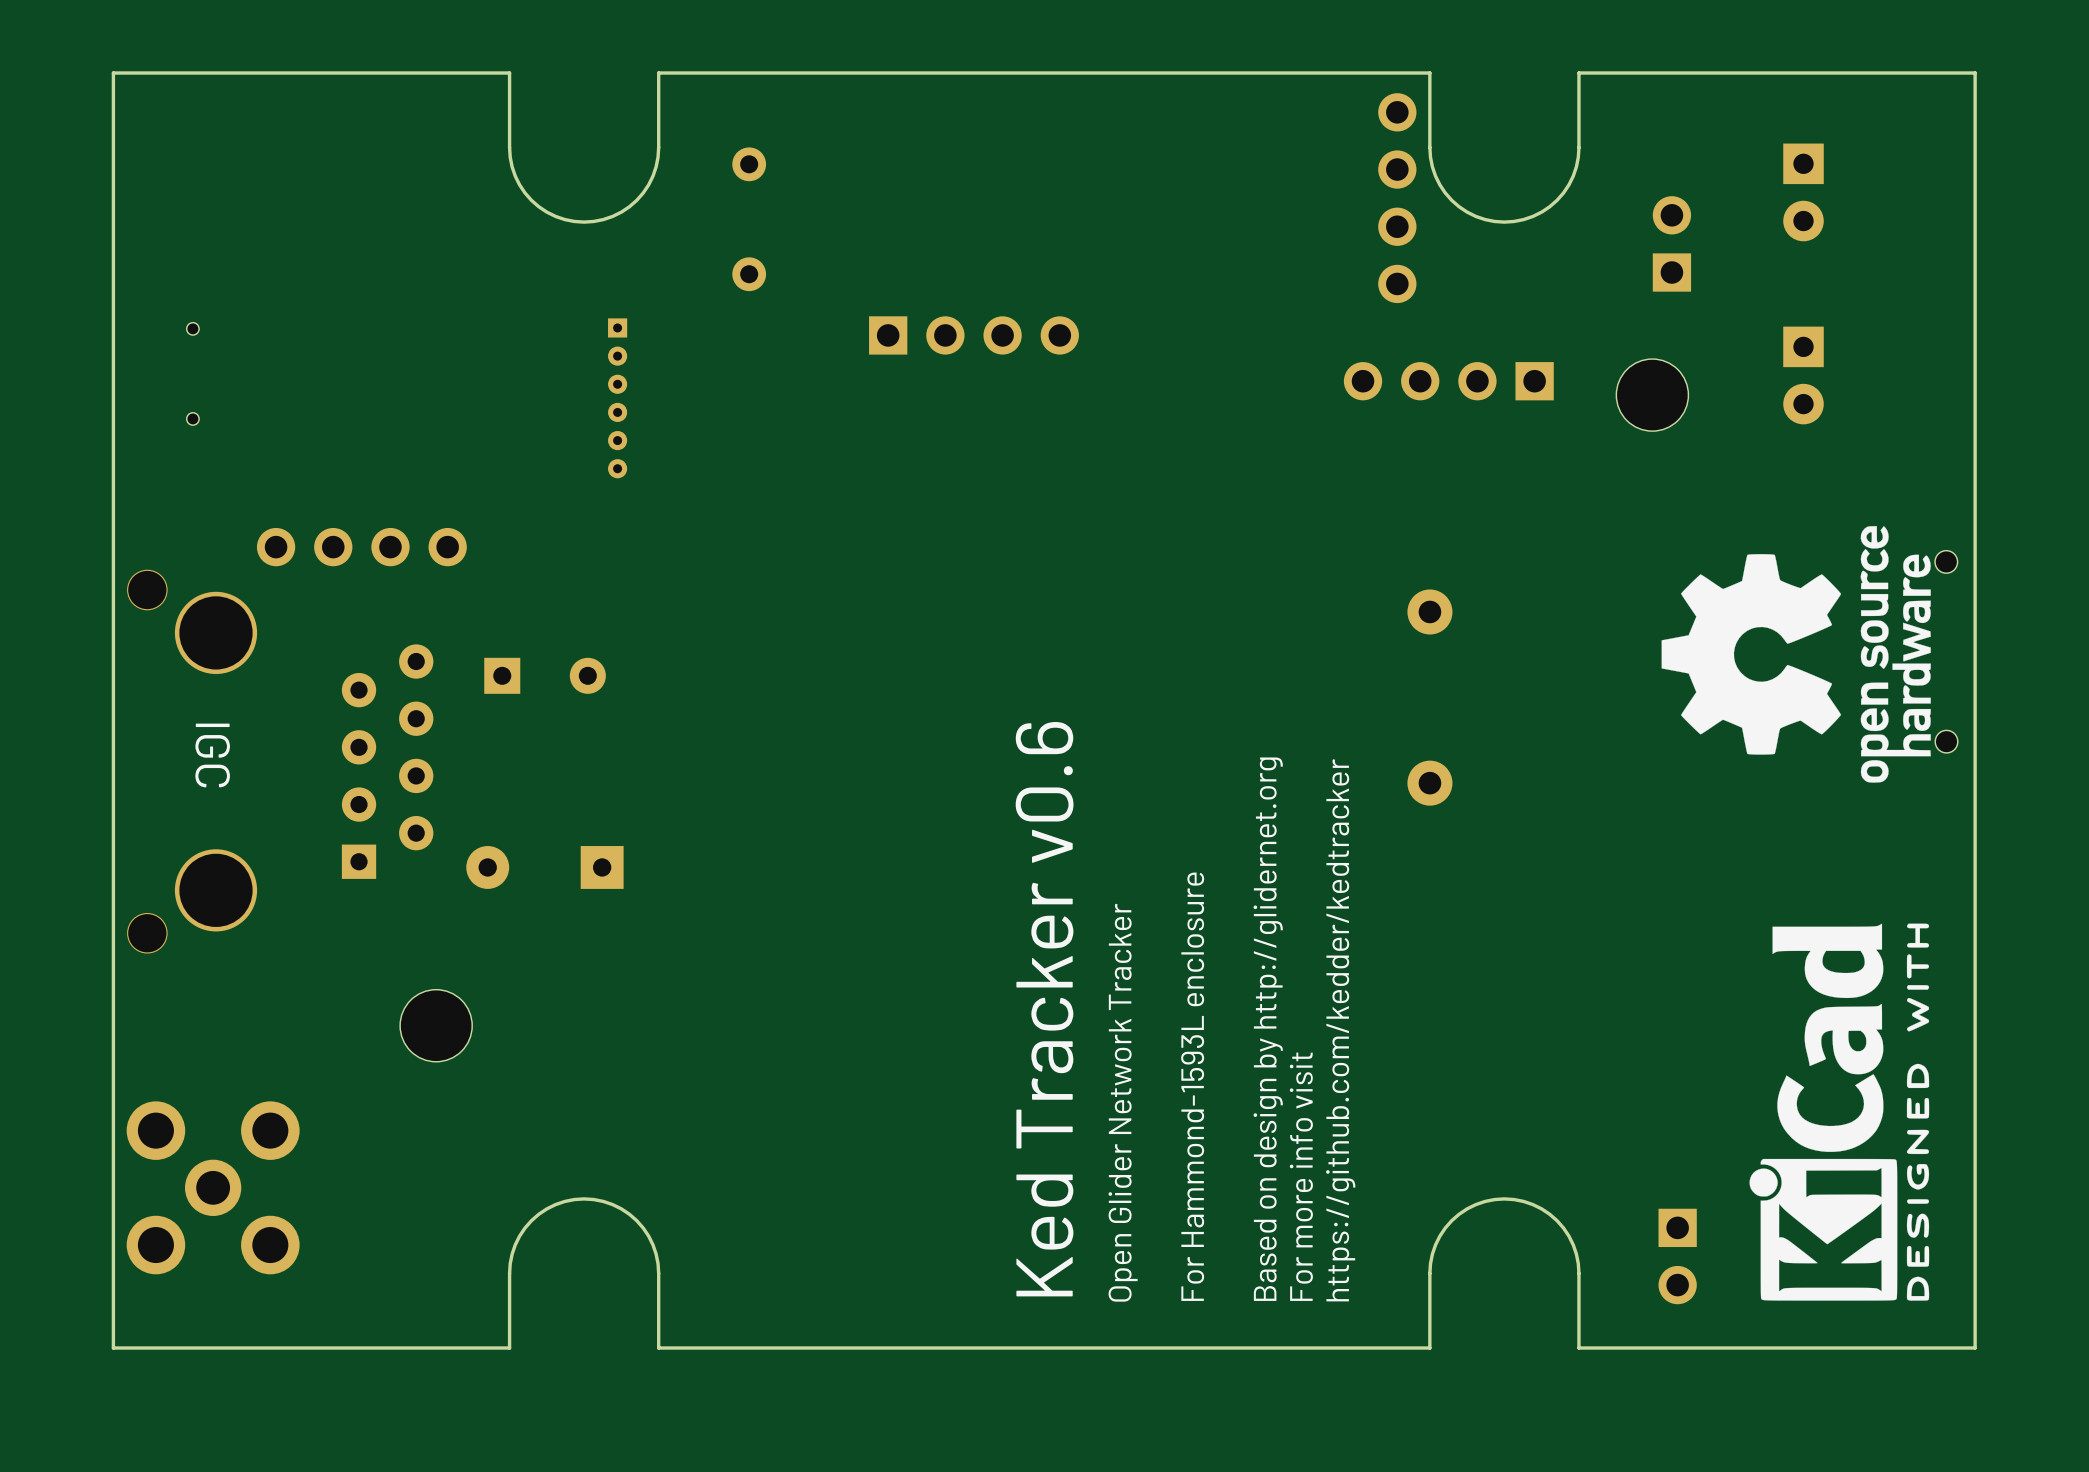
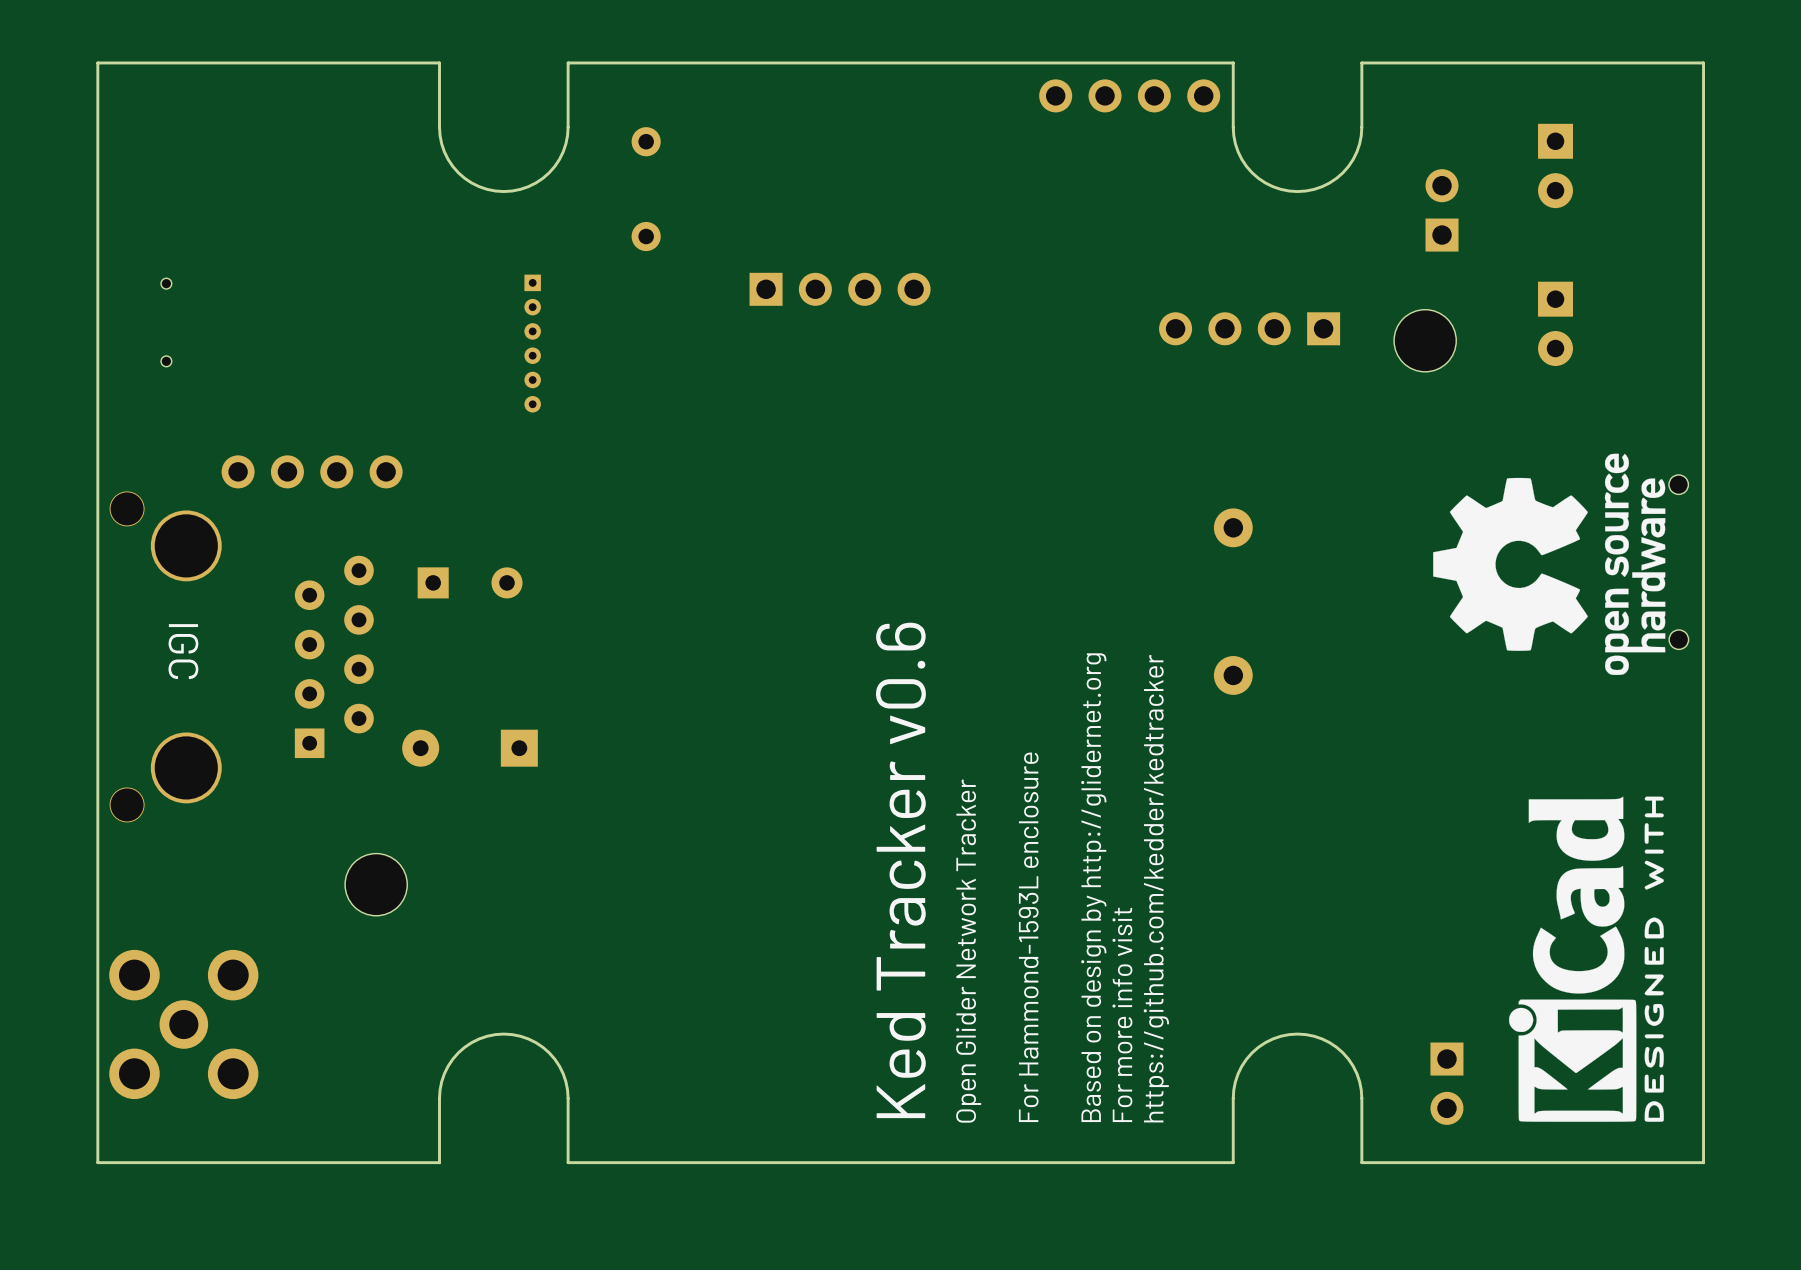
part rotation: 0° (1397, 198) -> 90° clockwise (1129, 95)

